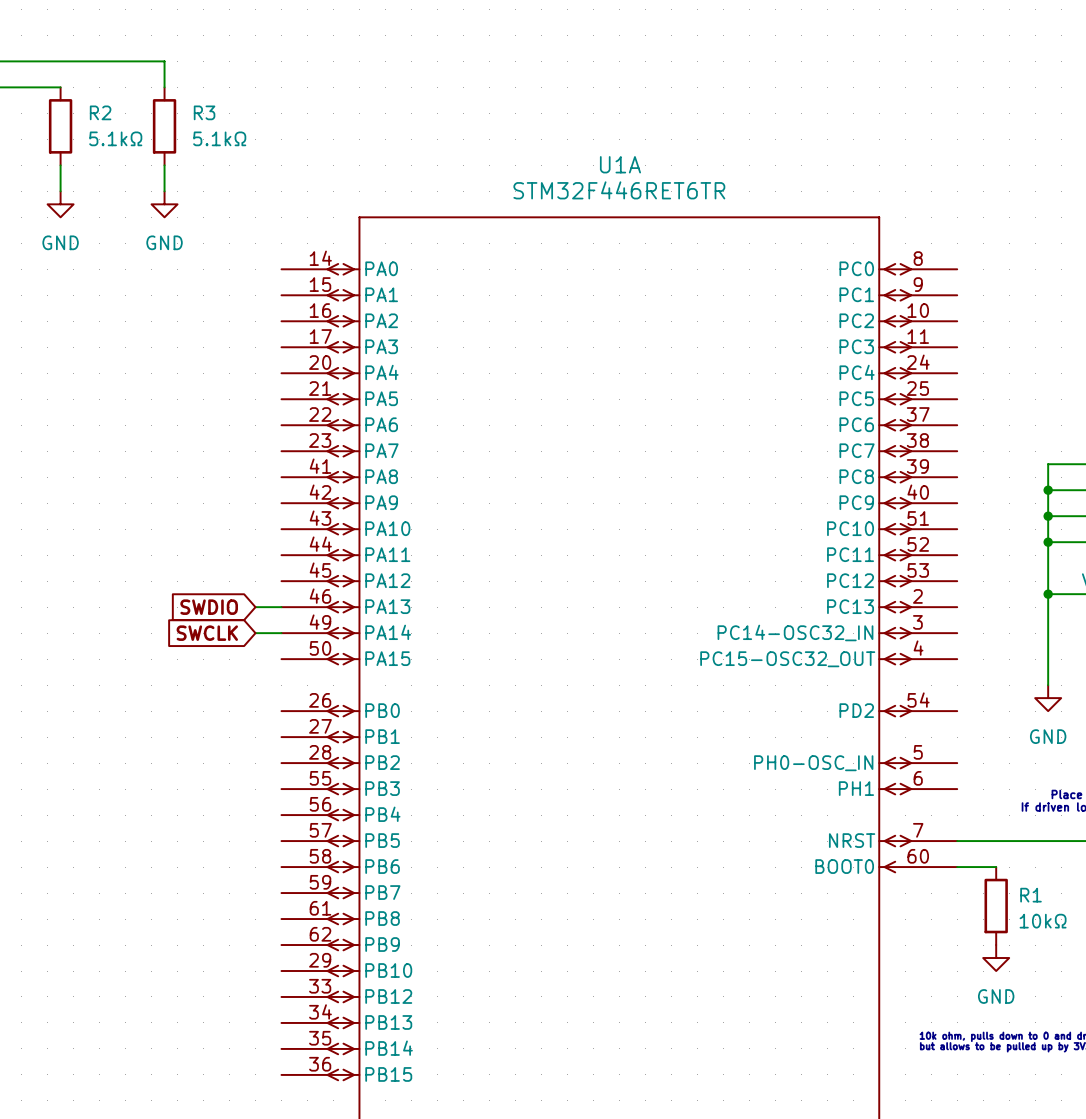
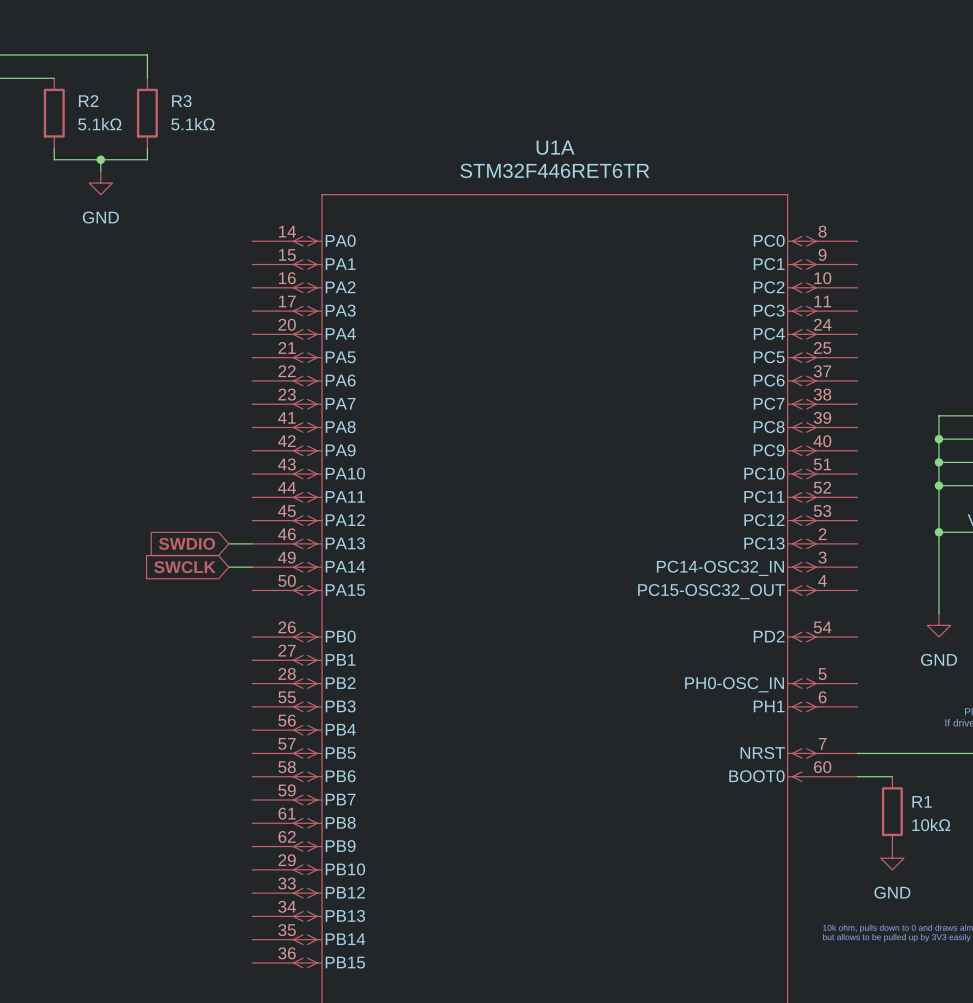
wire: (60, 178) (60, 191) -> (54, 159) (147, 159)
junction: none -> (100, 159)
wire: (164, 178) (164, 191) -> (100, 159) (100, 171)
power symbol: GND (60, 204) -> none
power symbol: none -> GND (100, 183)
power symbol: GND (164, 204) -> none

